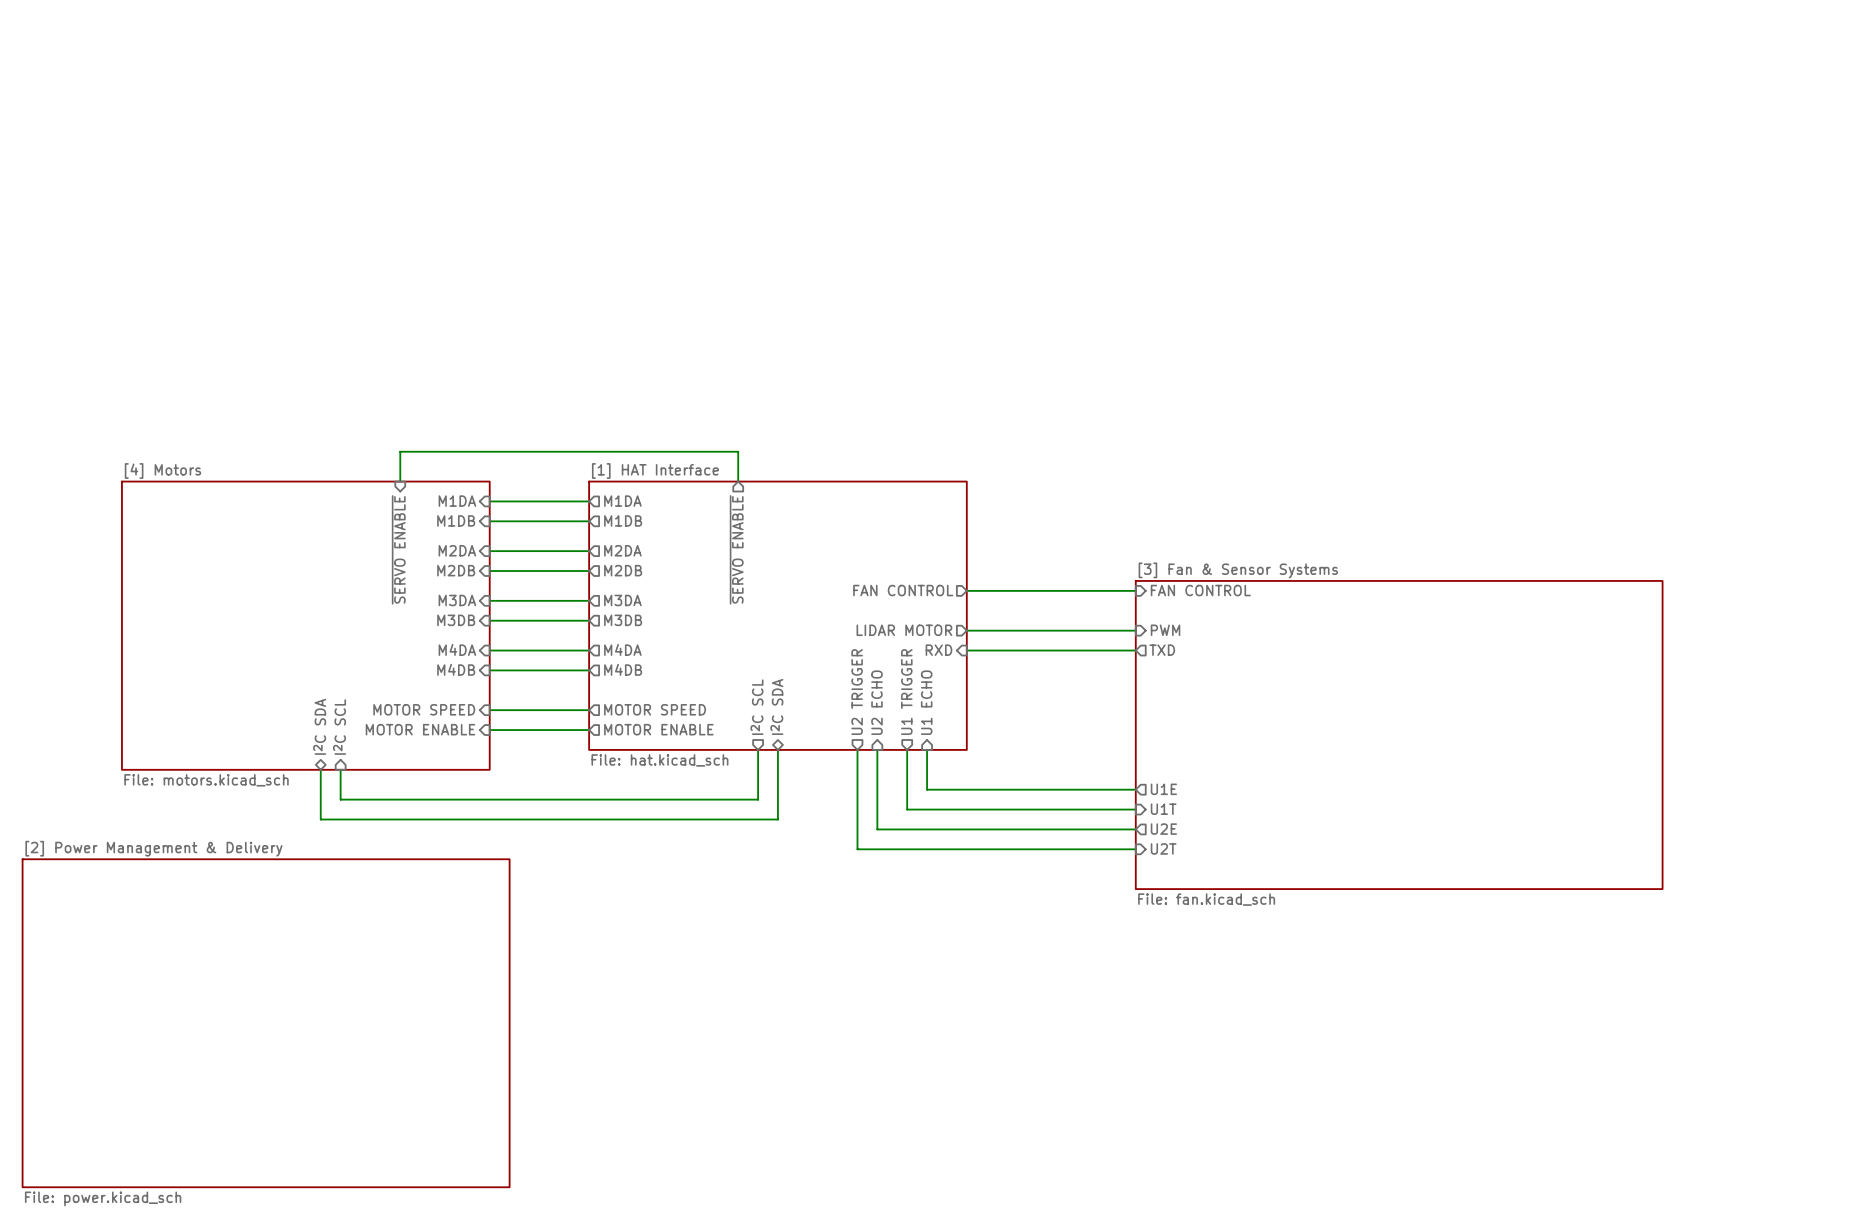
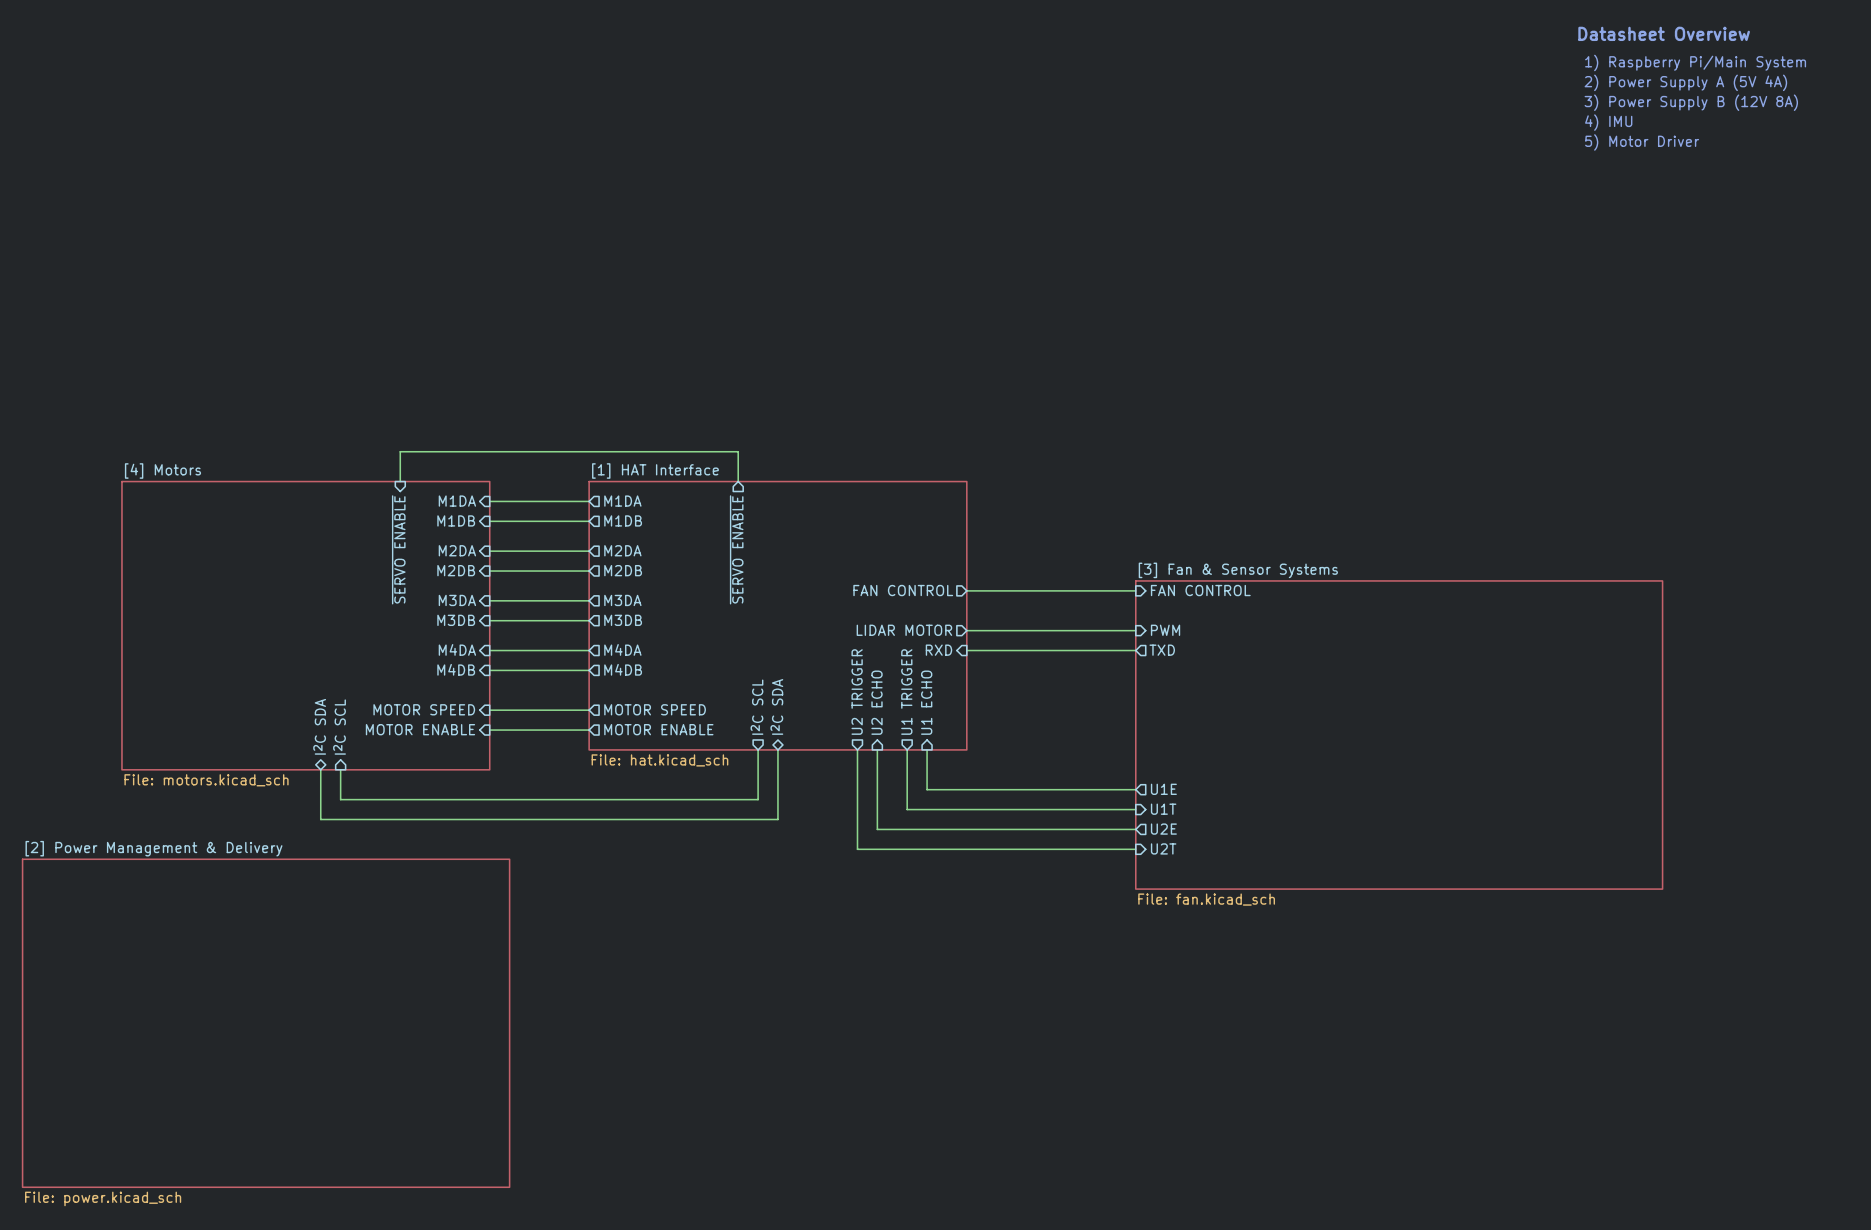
text: none -> Datasheet Overview (1664, 33)
text: none -> 1) Raspberry Pi/Main System (1695, 62)
text: none -> 2) Power Supply A (5V 4A) (1685, 82)
text: none -> 3) Power Supply B (12V 8A) (1691, 102)
text: none -> 4) IMU (1608, 122)
text: none -> 5) Motor Driver (1642, 142)

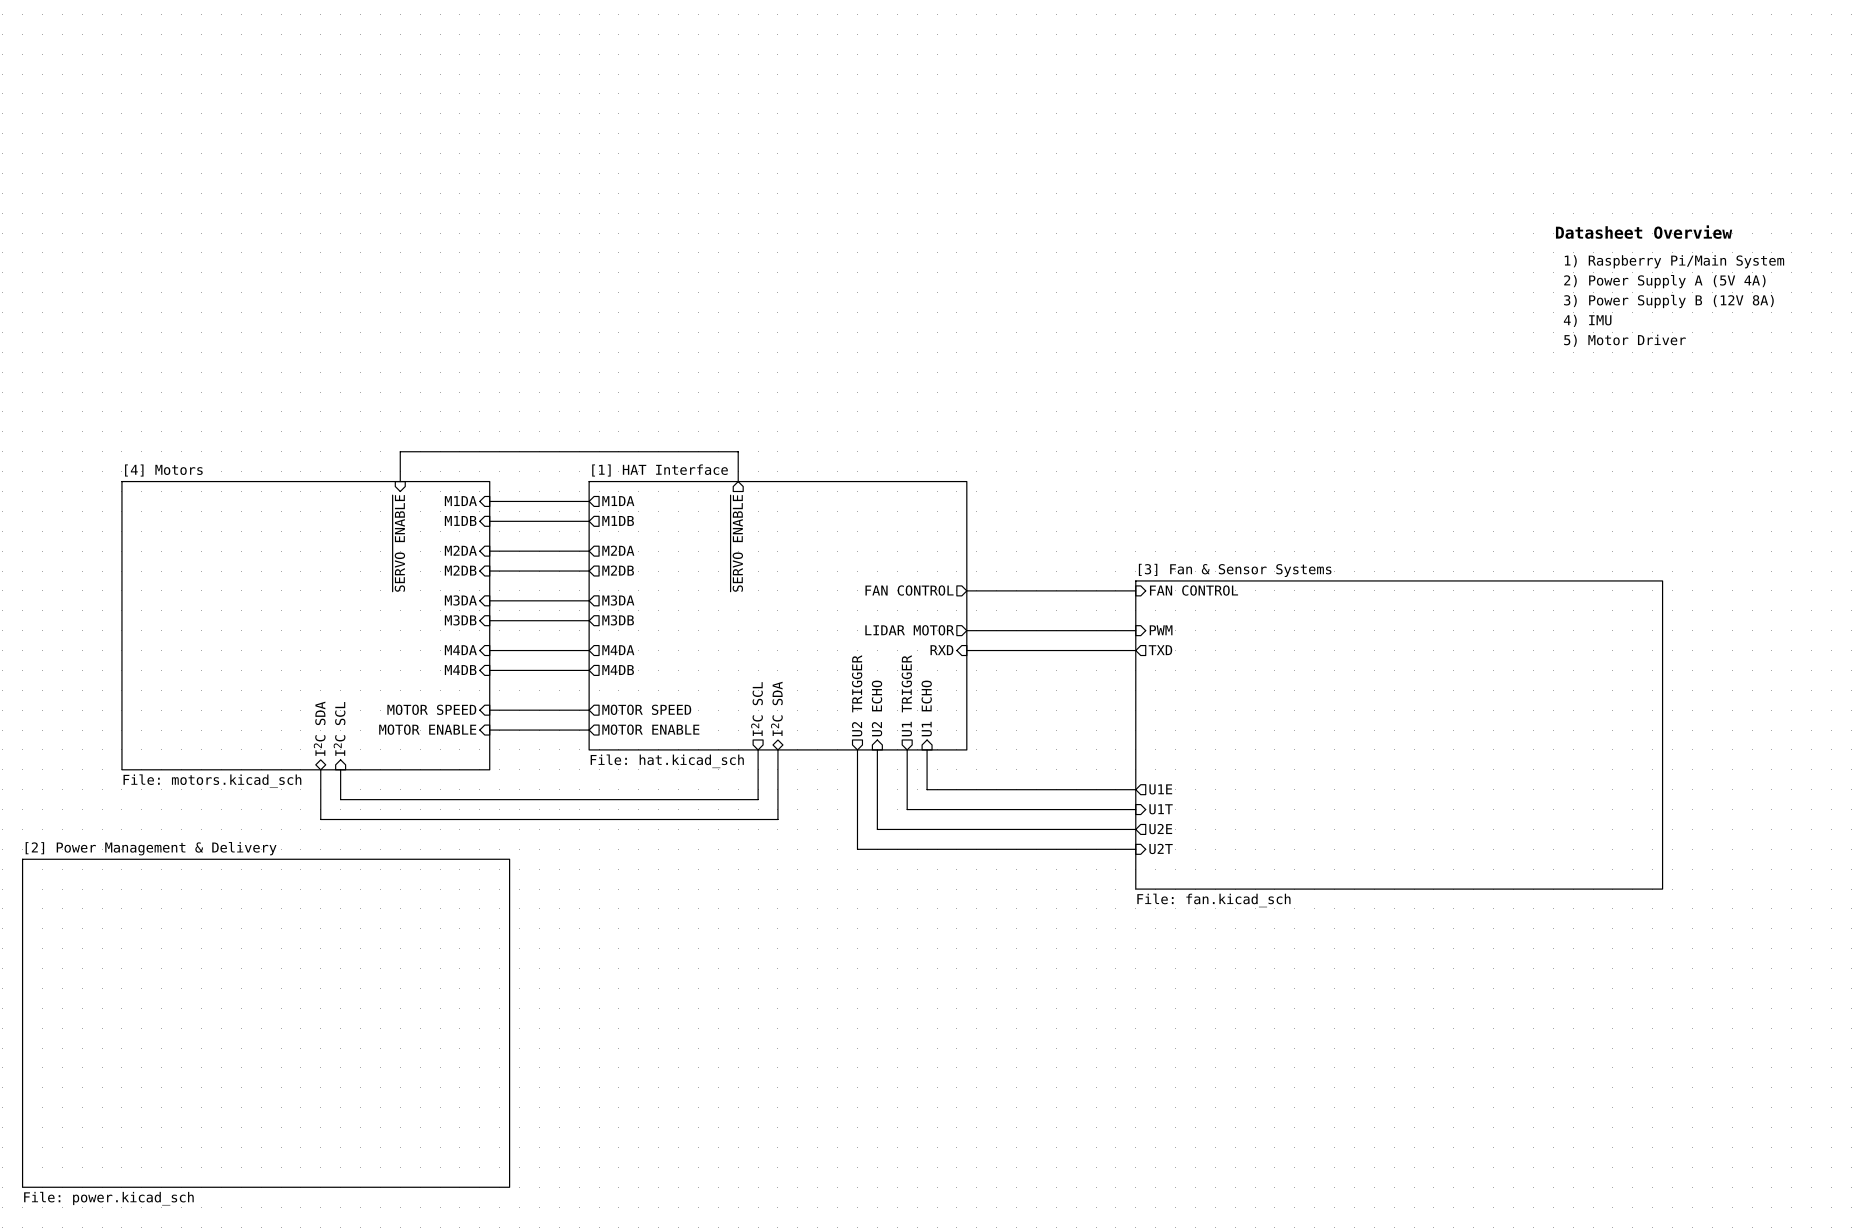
text: Datasheet Overview (1664, 33) -> none
text: 1) Raspberry Pi/Main System (1695, 62) -> none
text: 2) Power Supply A (5V 4A) (1685, 82) -> none
text: 3) Power Supply B (12V 8A) (1691, 102) -> none
text: 4) IMU (1608, 122) -> none
text: 5) Motor Driver (1642, 142) -> none
text: none -> Datasheet Overview (1644, 232)
text: none -> 1) Raspberry Pi/Main System (1674, 261)
text: none -> 2) Power Supply A (5V 4A) (1664, 281)
text: none -> 3) Power Supply B (12V 8A) (1668, 301)
text: none -> 4) IMU (1587, 320)
text: none -> 5) Motor Driver (1624, 340)

